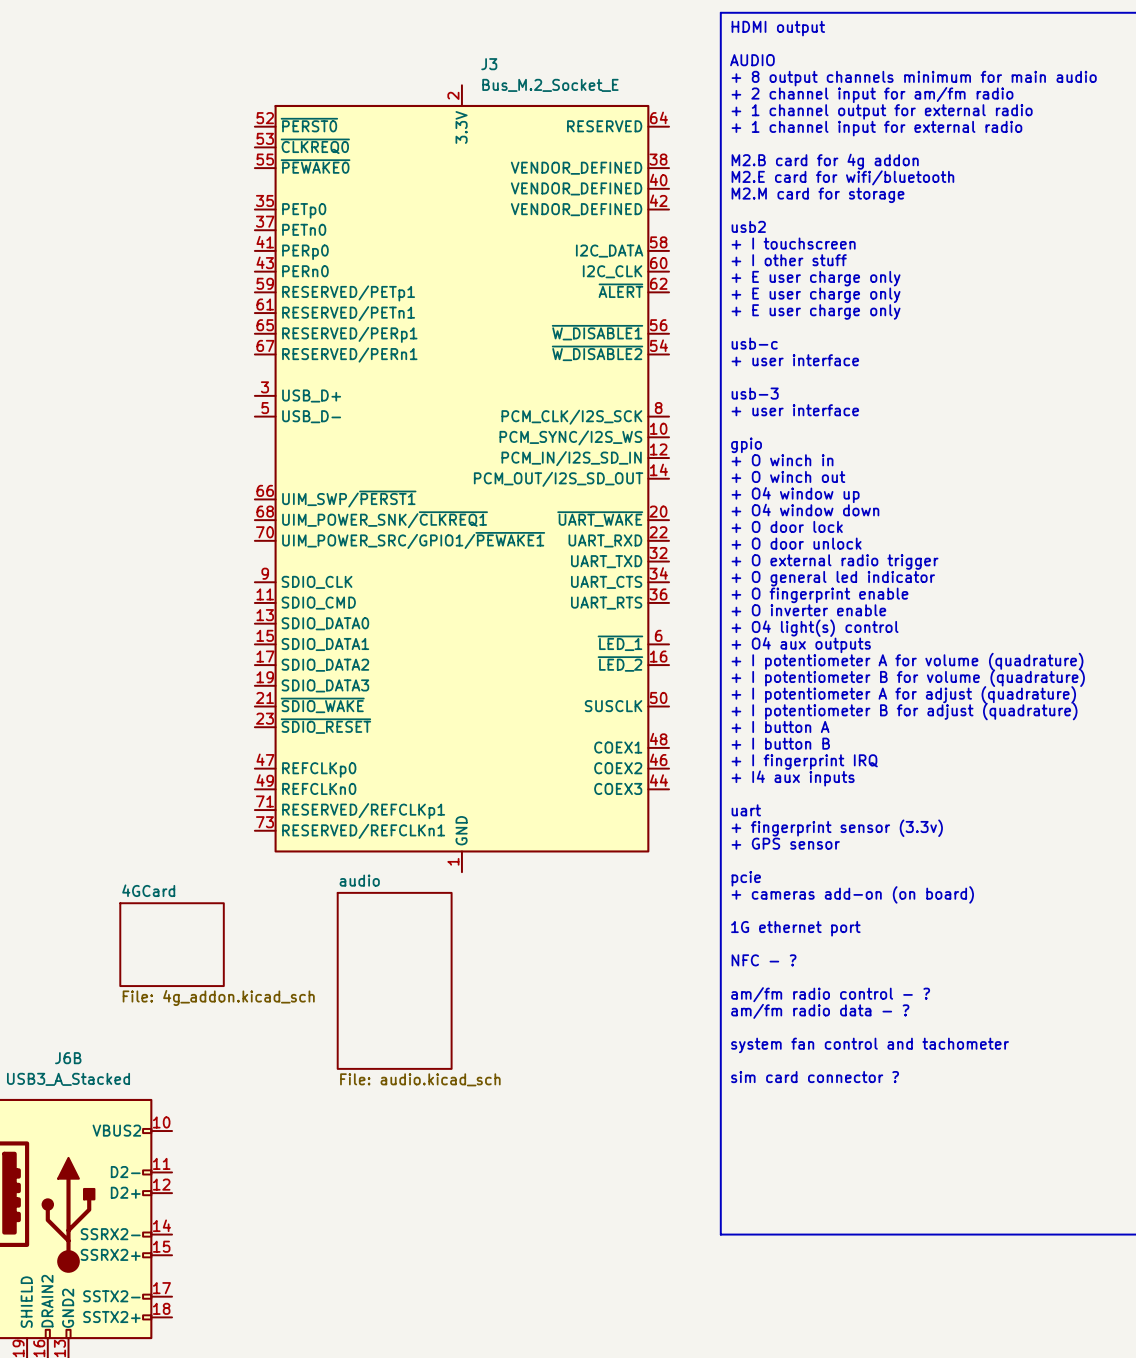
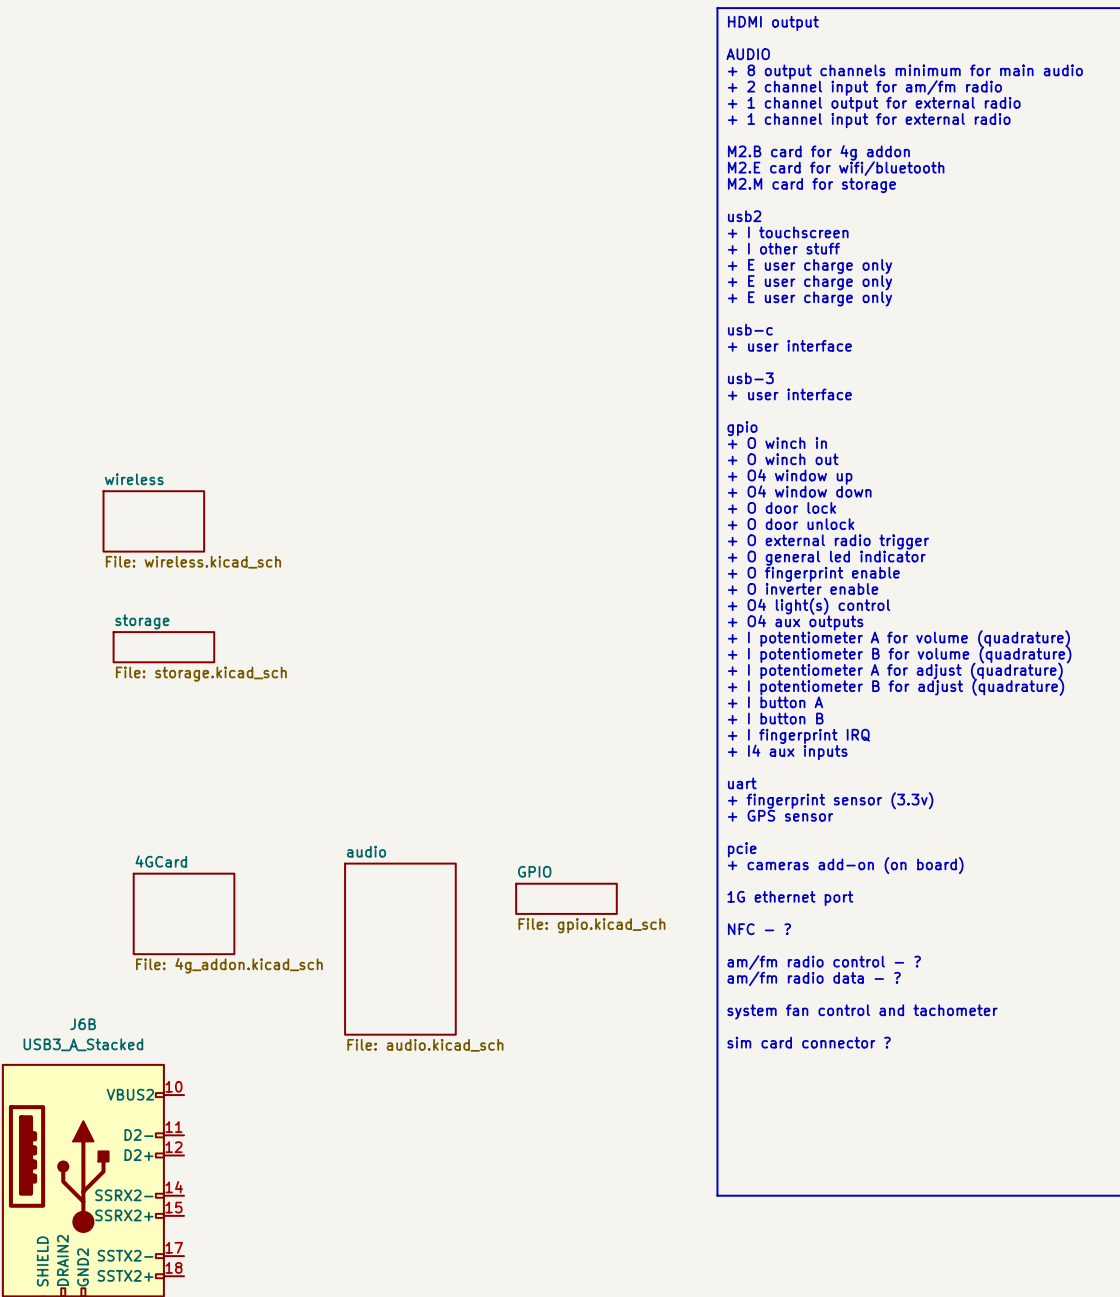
J3: Bus_M.2_Socket_E (461, 478) -> none
sheet wireless: none -> File: wireless.kicad_sch (153, 521)
sheet storage: none -> File: storage.kicad_sch (163, 647)
sheet GPIO: none -> File: gpio.kicad_sch (566, 898)

